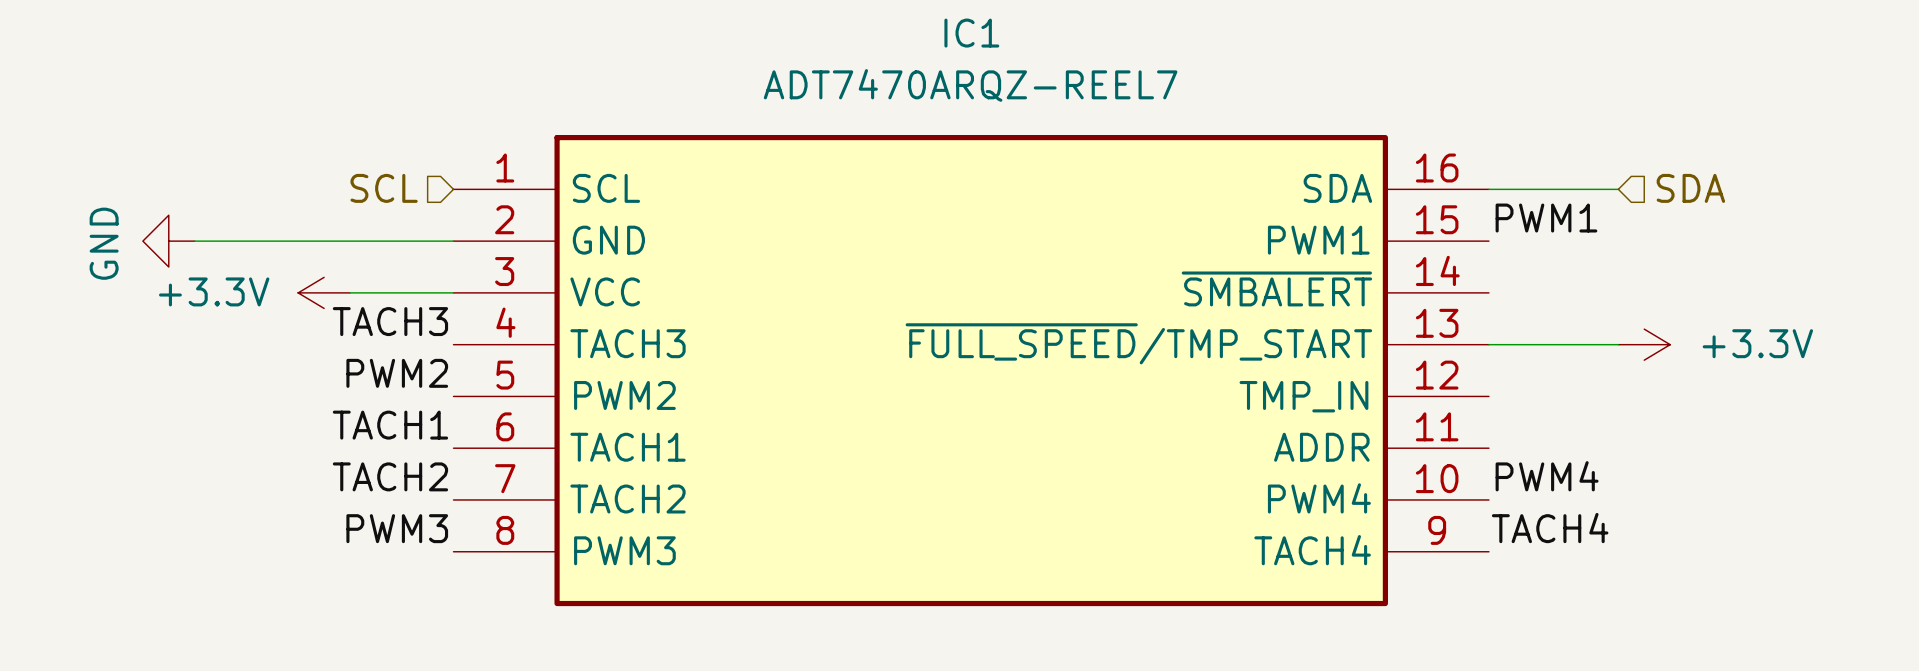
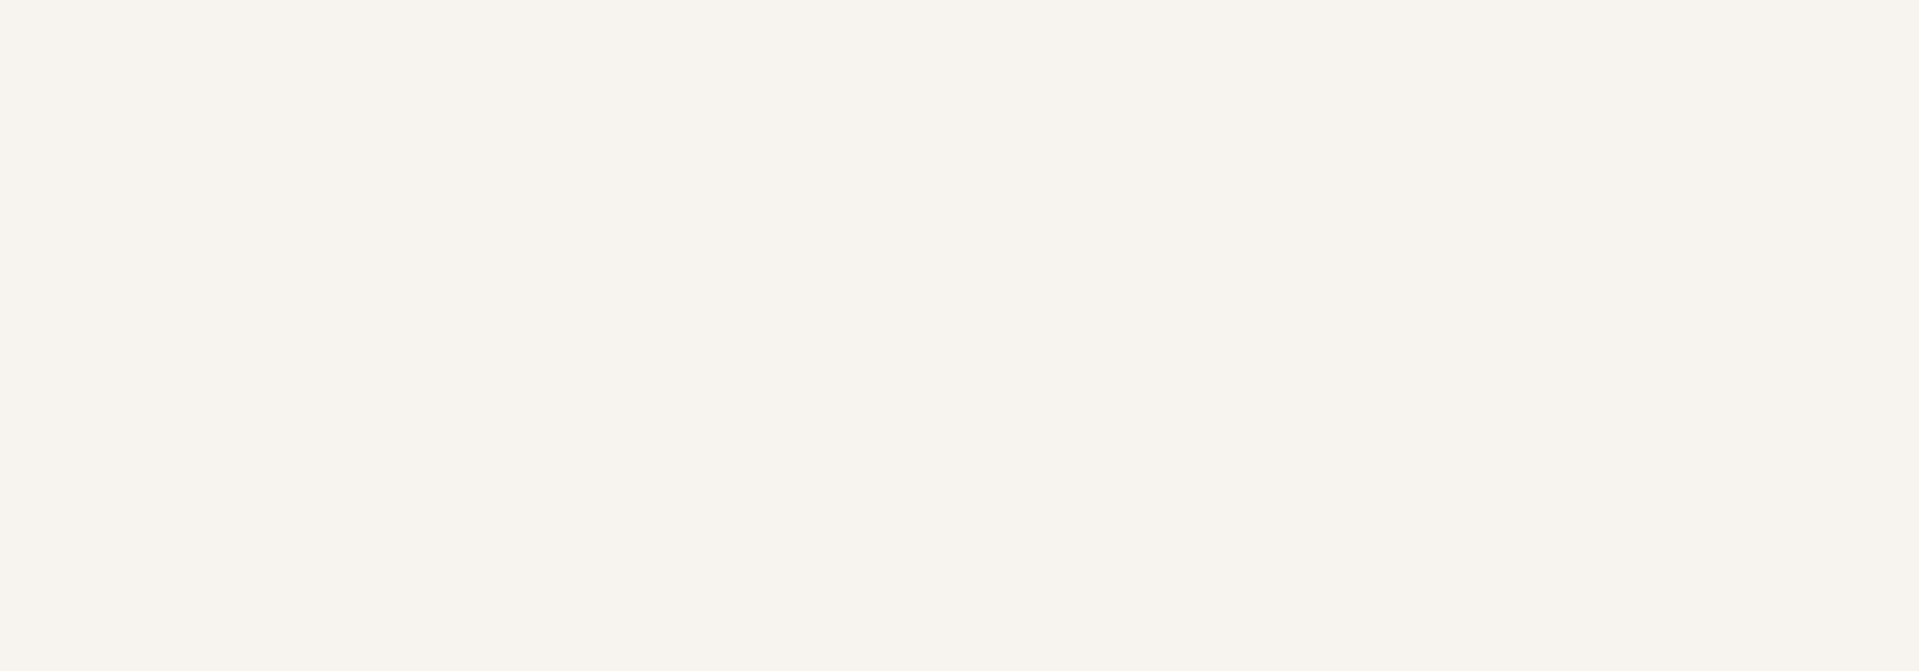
hierarchical label: SCL (384, 188) -> none
hierarchical label: SDA (1690, 188) -> none
wire: (1488, 189) (1618, 189) -> none
label: PWM1 (1546, 218) -> none
power symbol: GND (168, 241) -> none
wire: (194, 241) (453, 241) -> none
power symbol: +3.3V (324, 292) -> none
wire: (349, 292) (453, 292) -> none
label: TACH3 (390, 321) -> none
wire: (1488, 344) (1618, 344) -> none
power symbol: +3.3V (1644, 344) -> none
IC1: ADT7470ARQZ-REEL7 (971, 370) -> none
label: PWM2 (397, 373) -> none
label: TACH1 (390, 425) -> none
label: TACH2 (390, 476) -> none
label: PWM4 (1547, 476) -> none
label: PWM3 (397, 528) -> none
label: TACH4 (1550, 528) -> none

